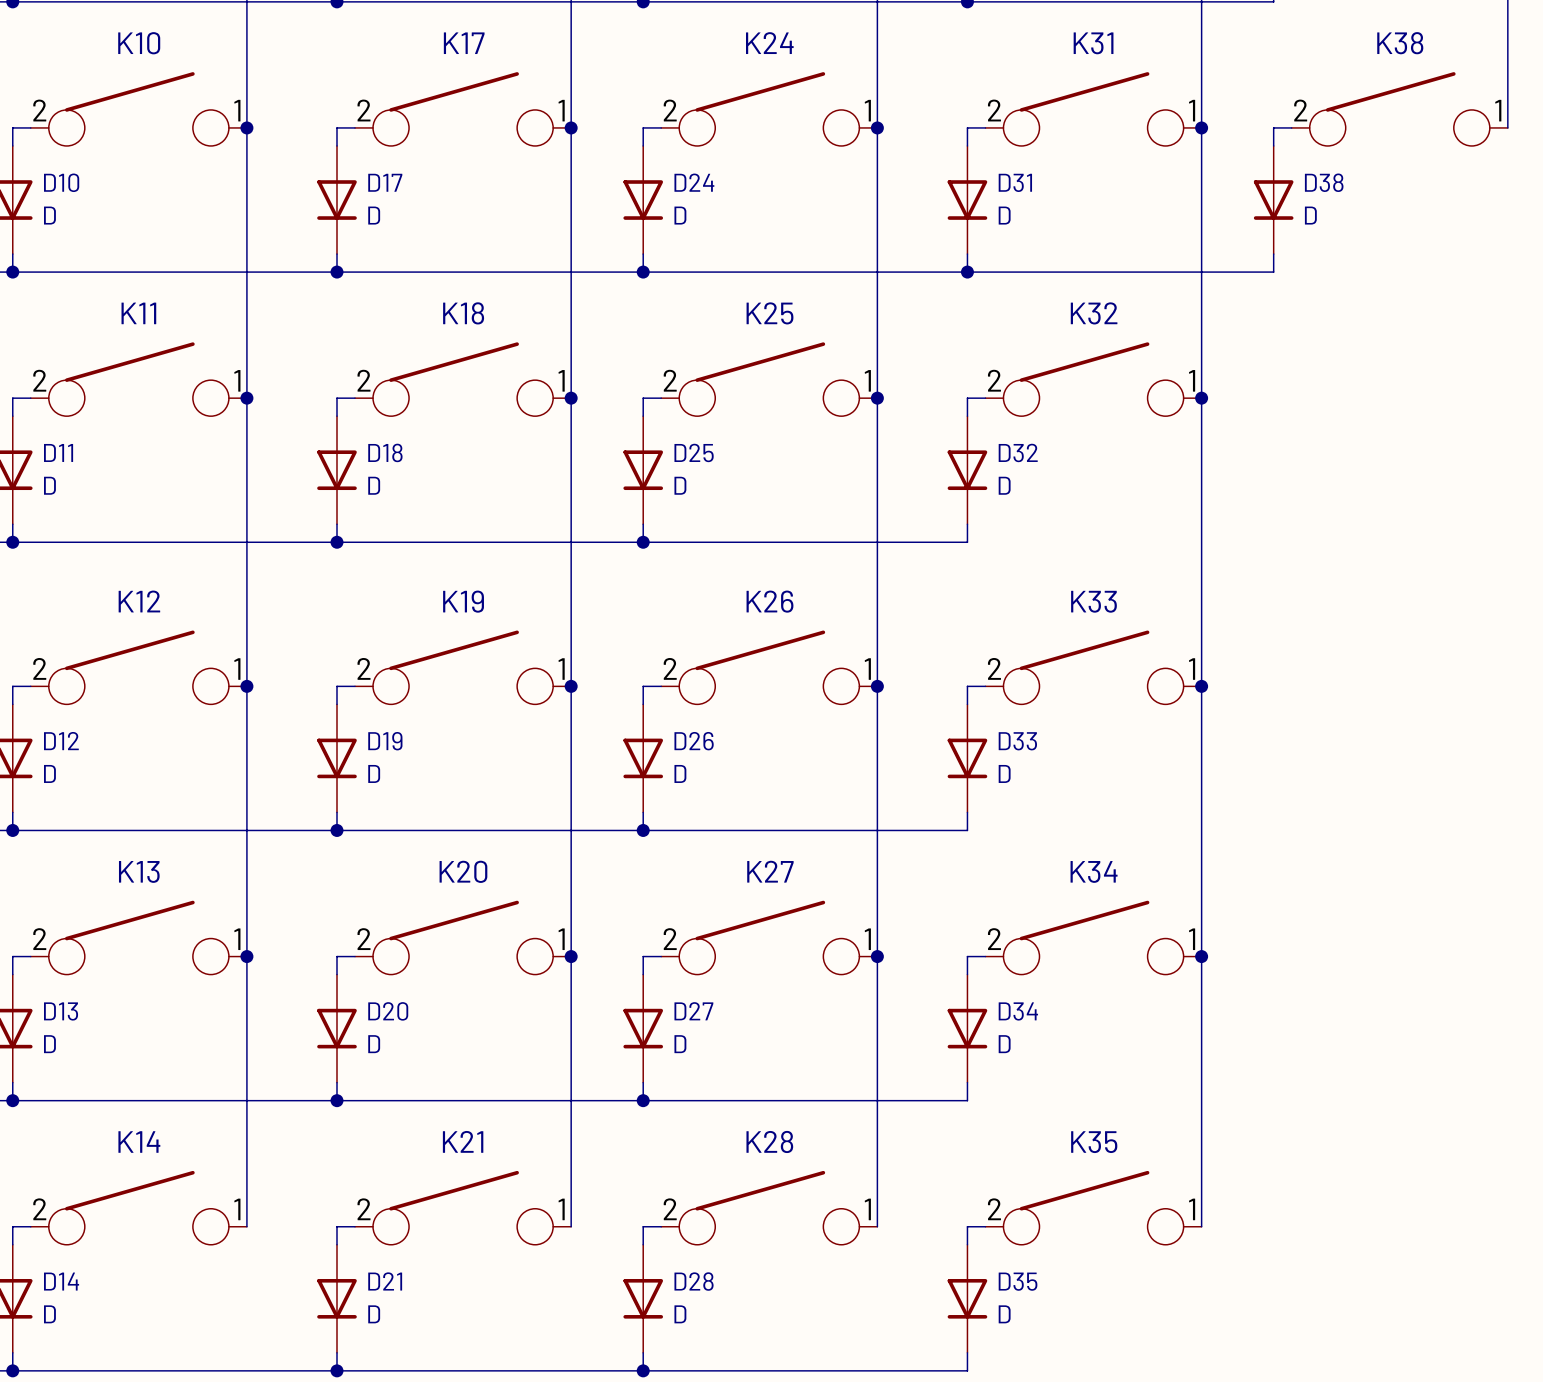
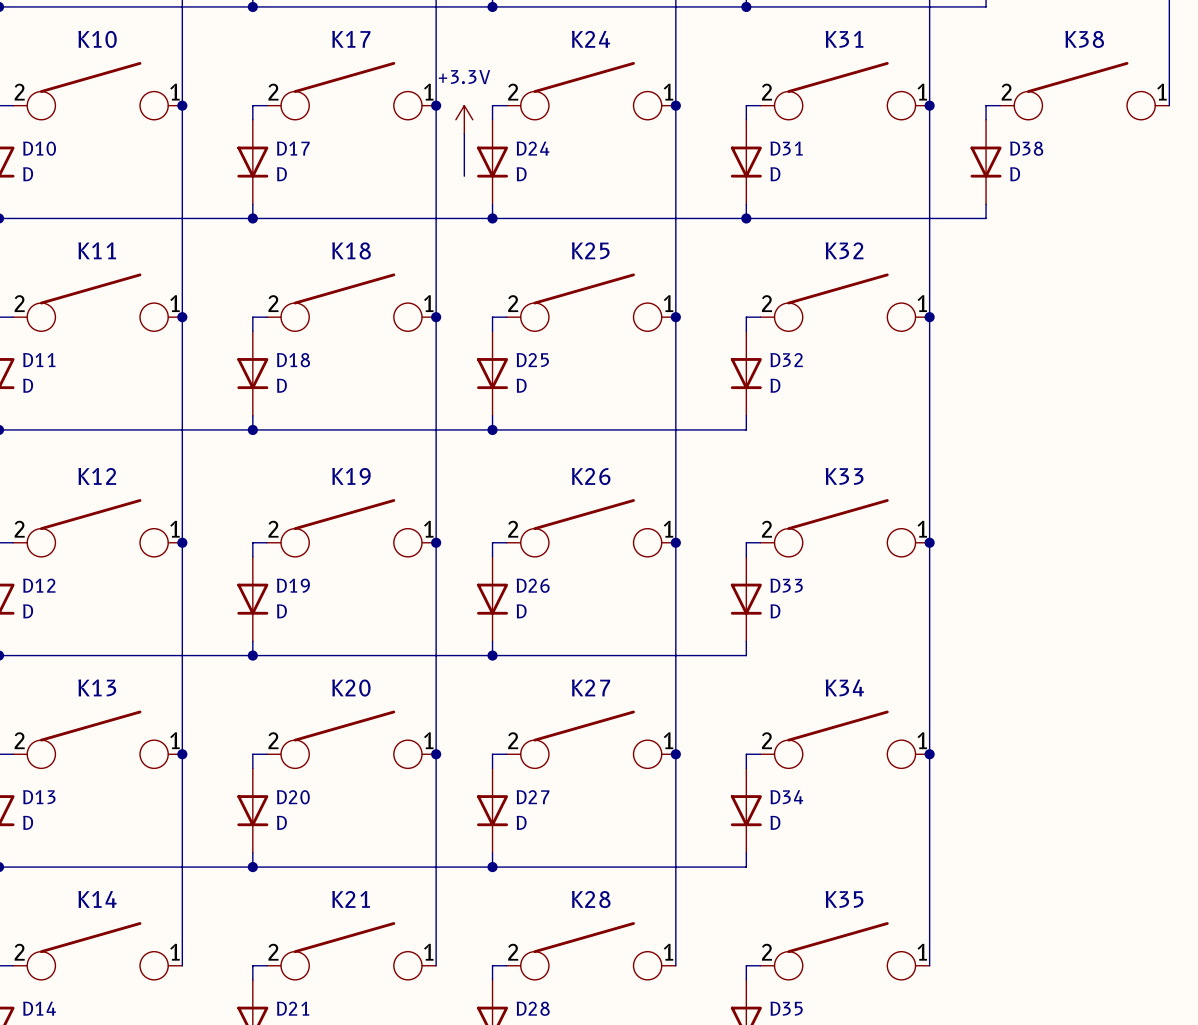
power symbol: none -> +3.3V (464, 119)
wire: none -> (464, 133) (464, 176)

